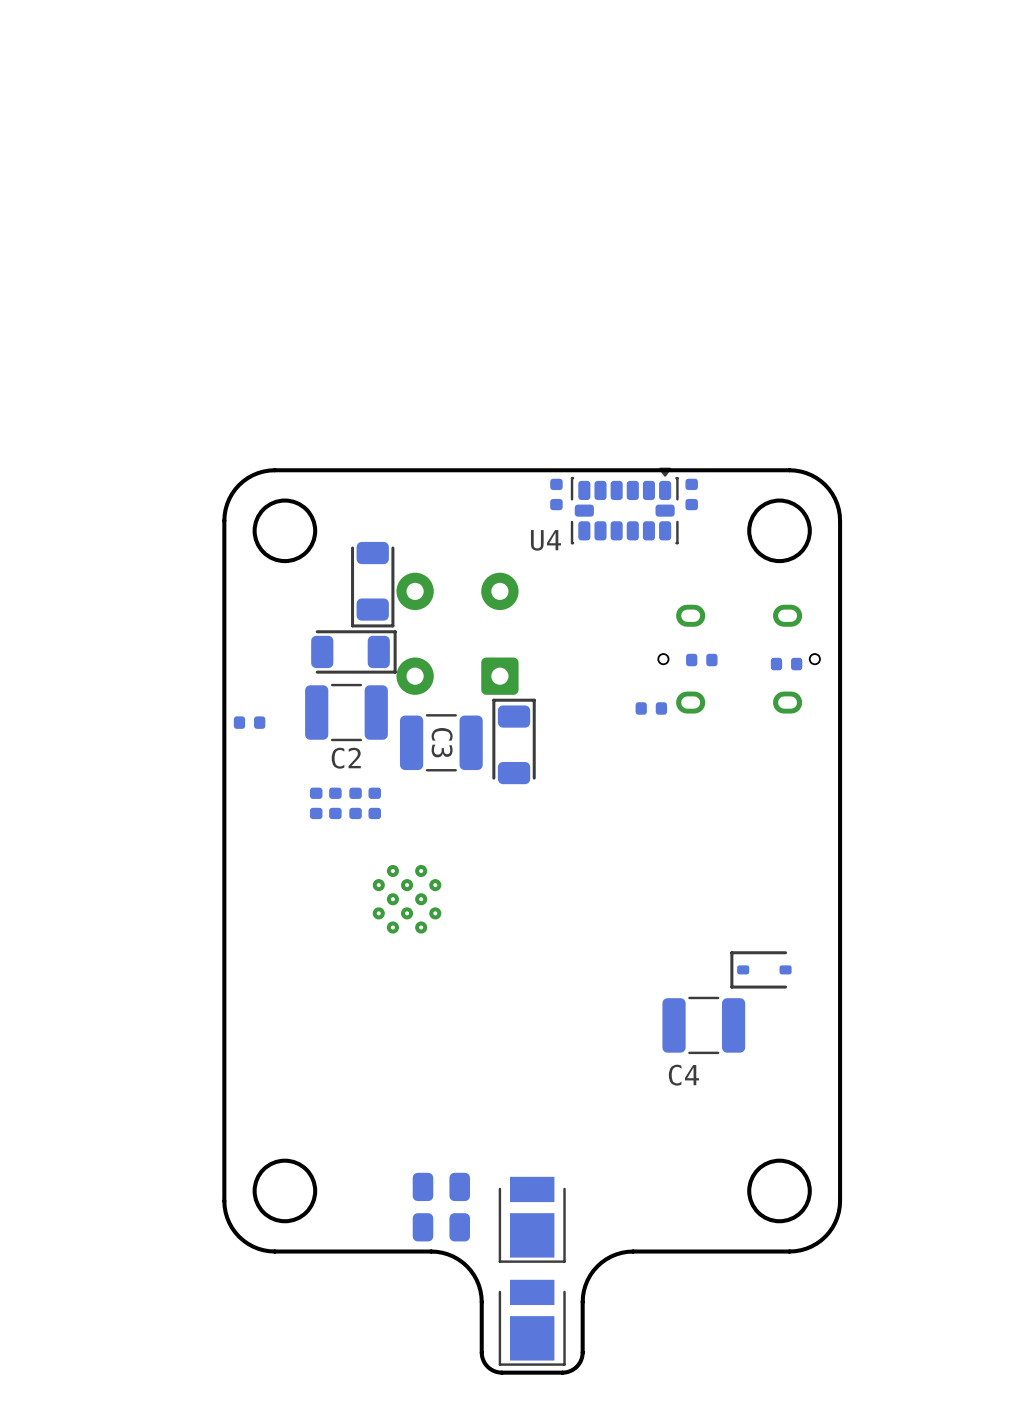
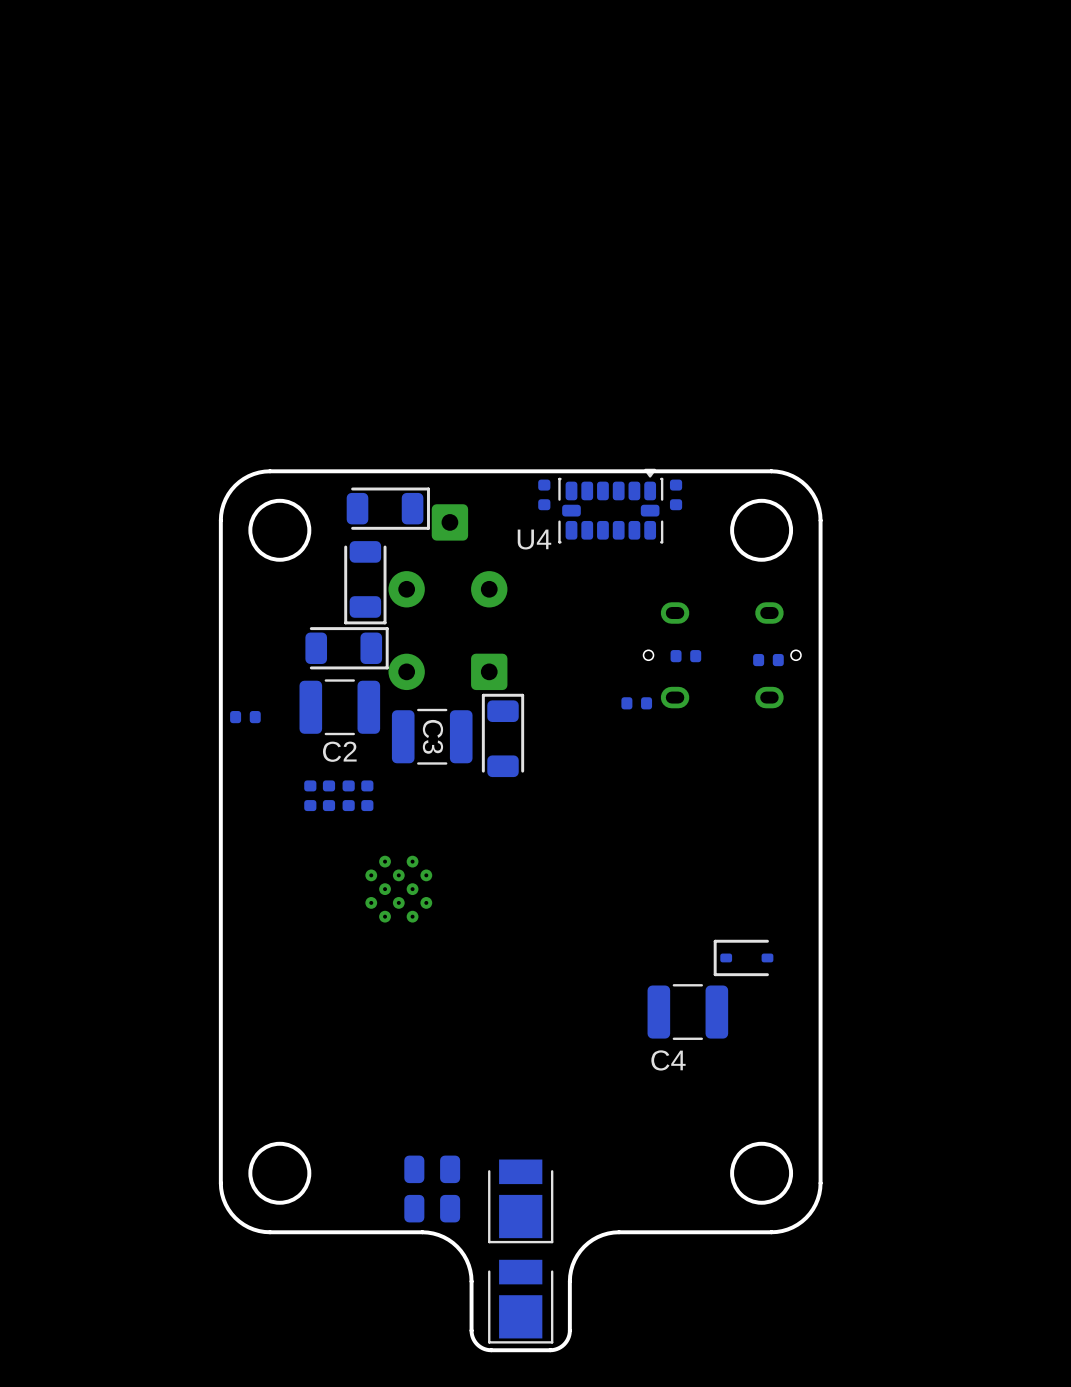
part: none -> (388, 508)
part: none -> (449, 522)

